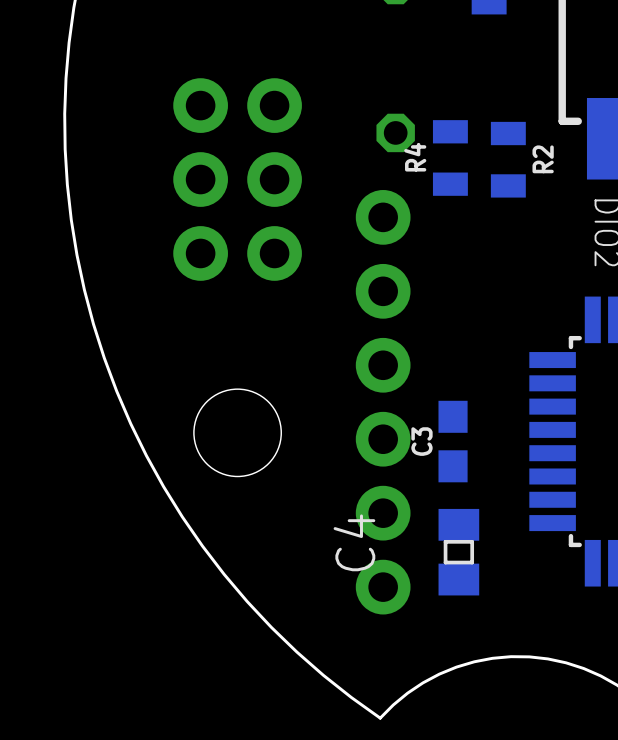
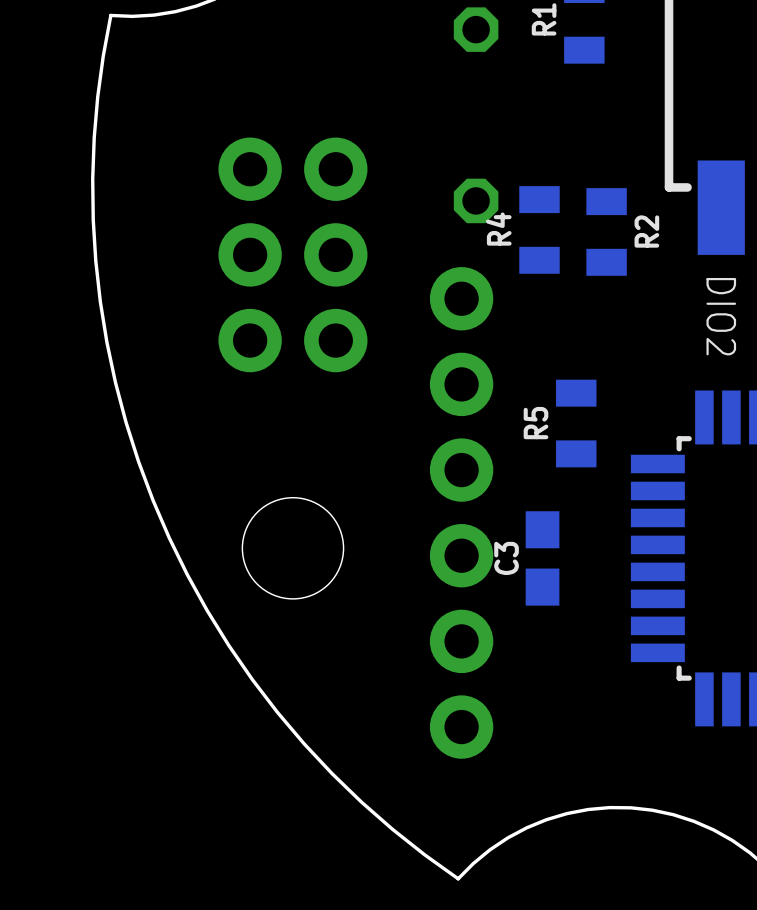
R5: none -> (576, 423)
C4: (458, 552) -> none

